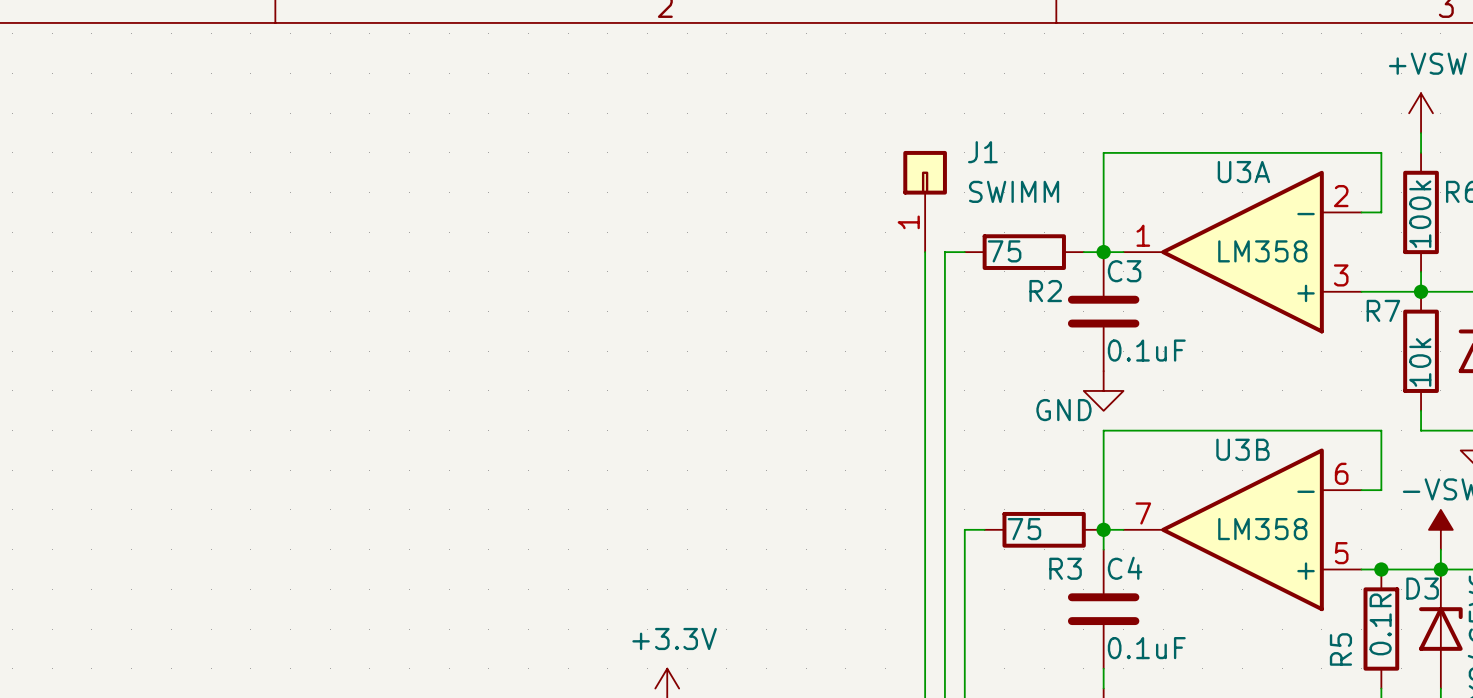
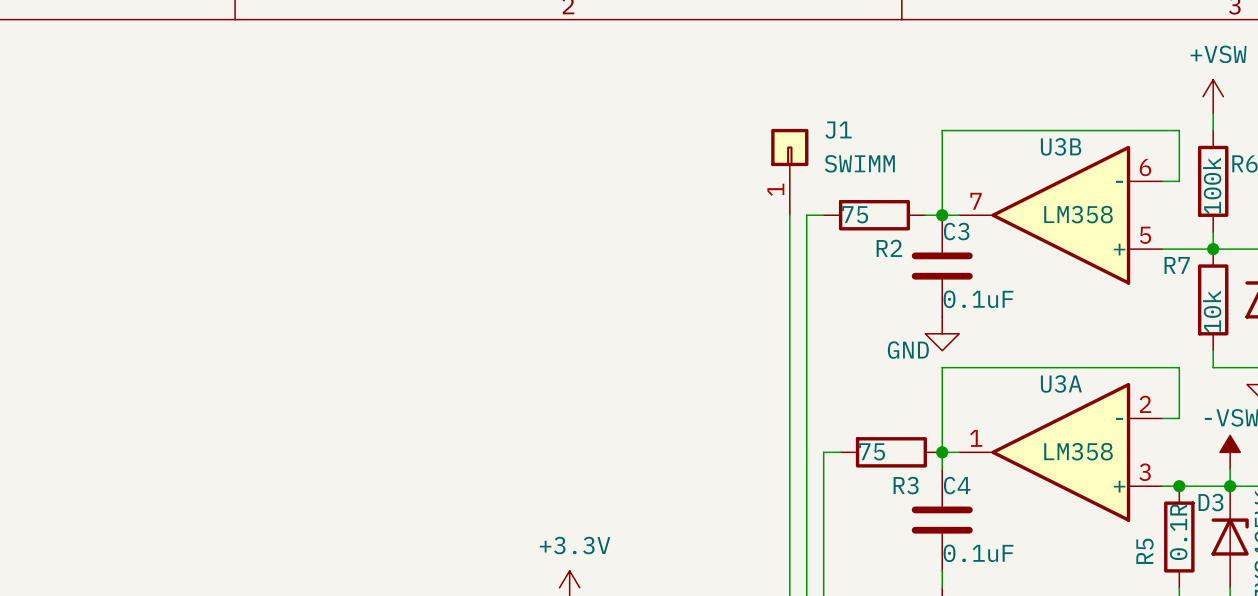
U3A position: (1242, 252) -> (1060, 452)
U3B position: (1242, 529) -> (1060, 215)

